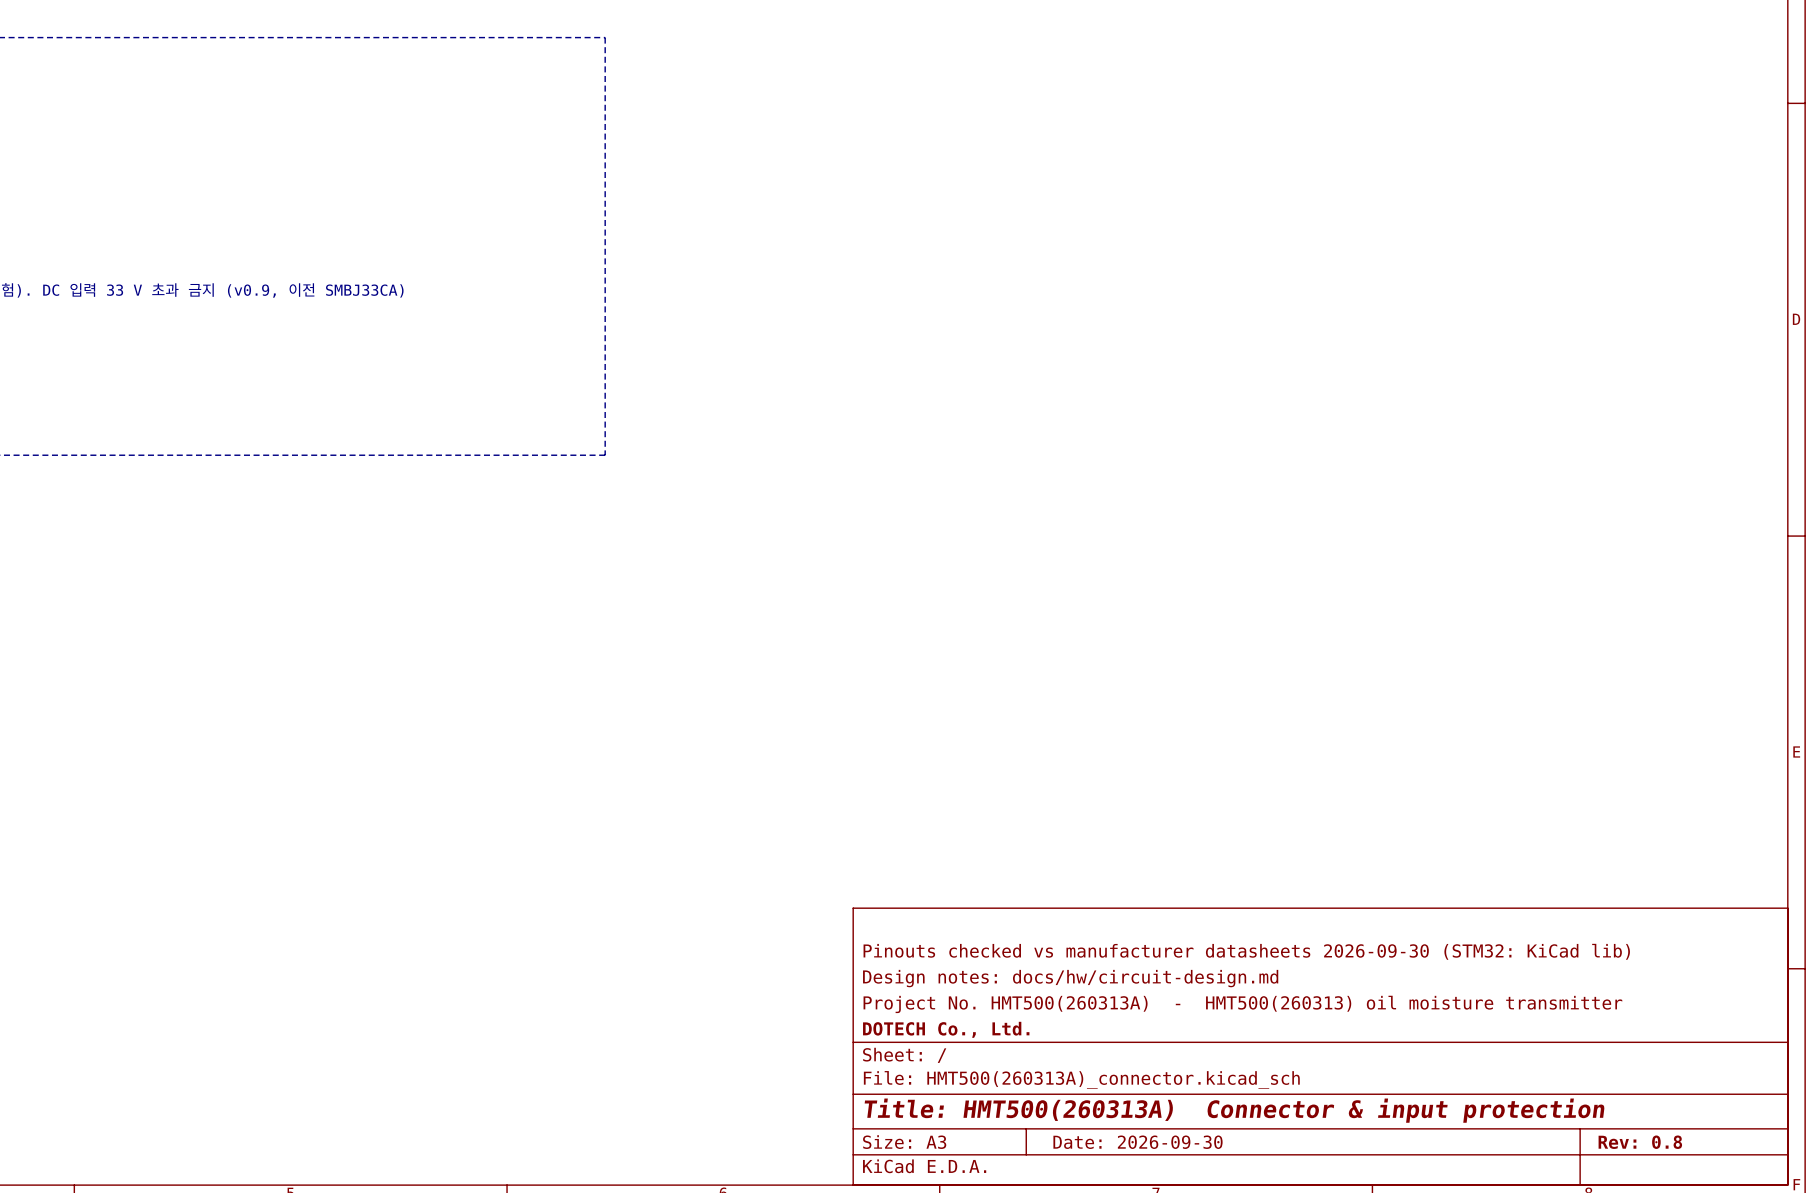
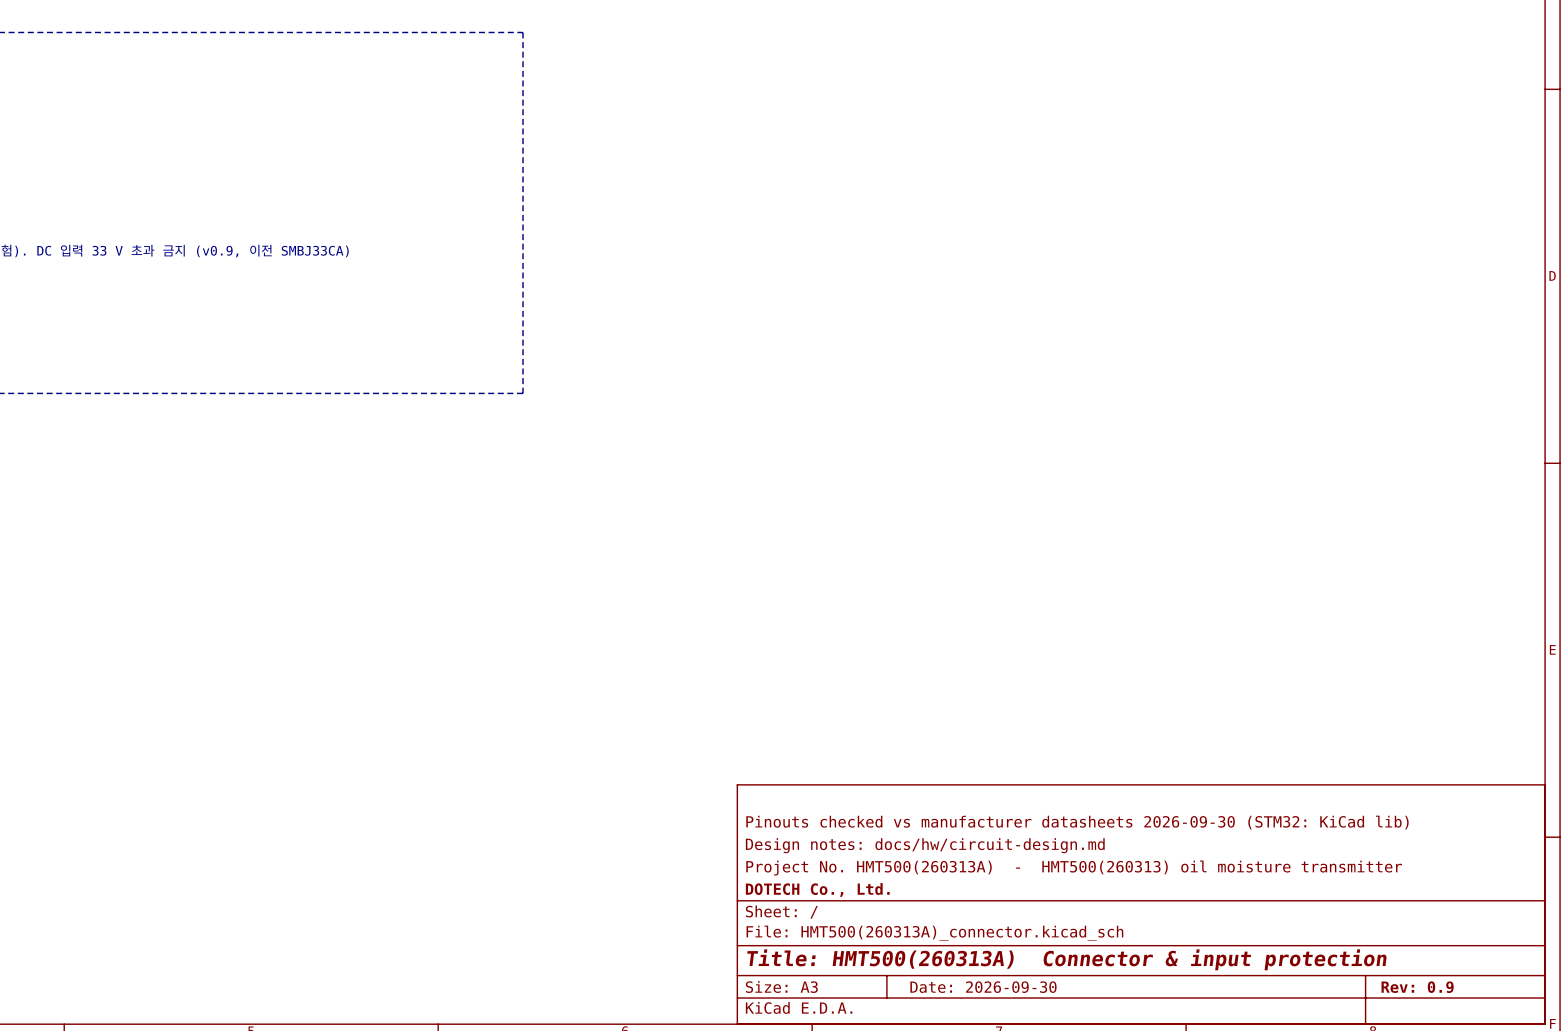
title block: Rev: 0.8 (1640, 1142) -> Rev: 0.9 (1417, 987)

